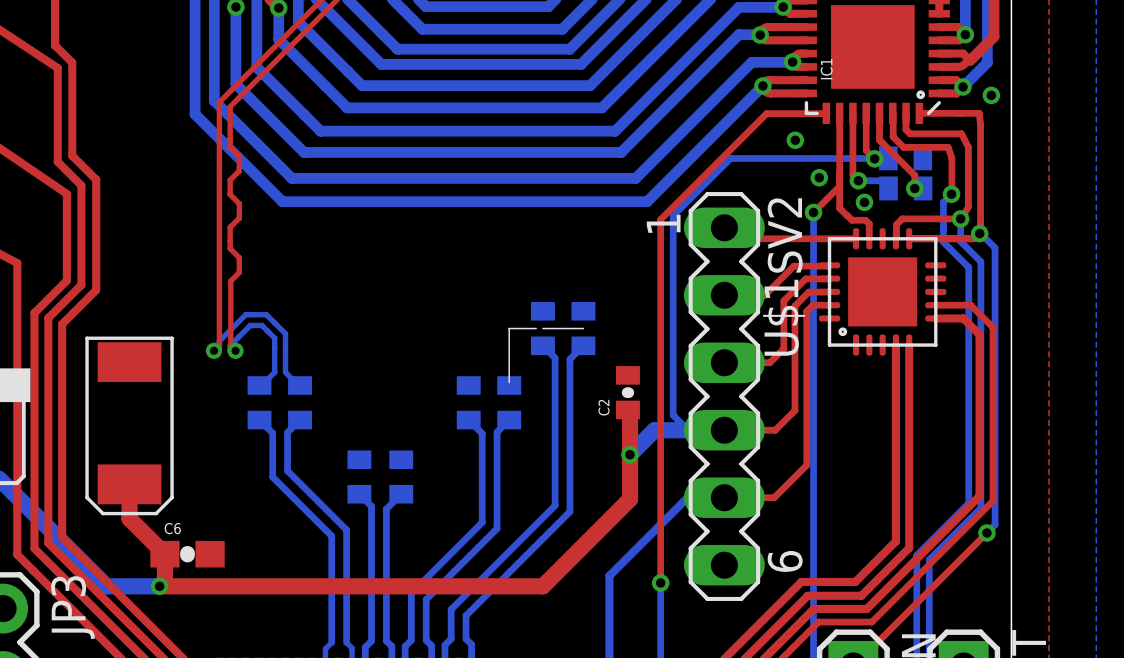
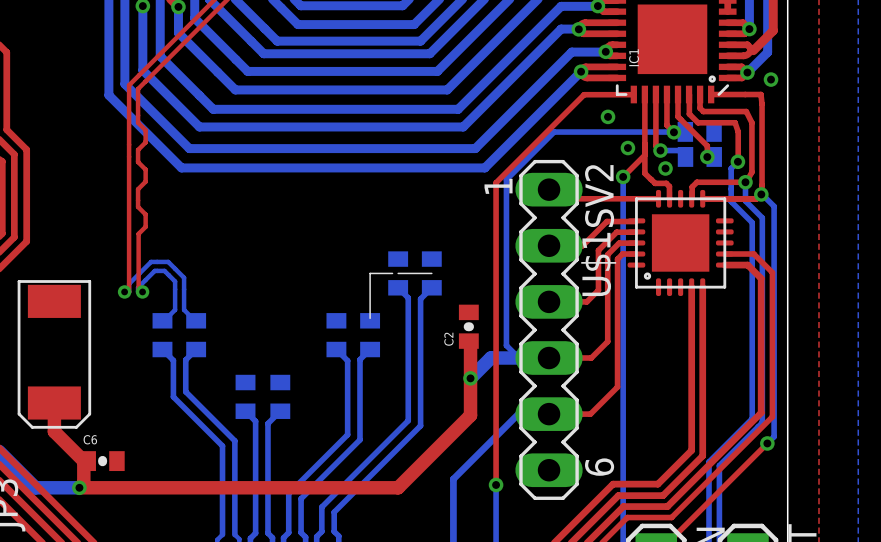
C6 footprint: [150, 540, 225, 568] -> [80, 451, 125, 472]

